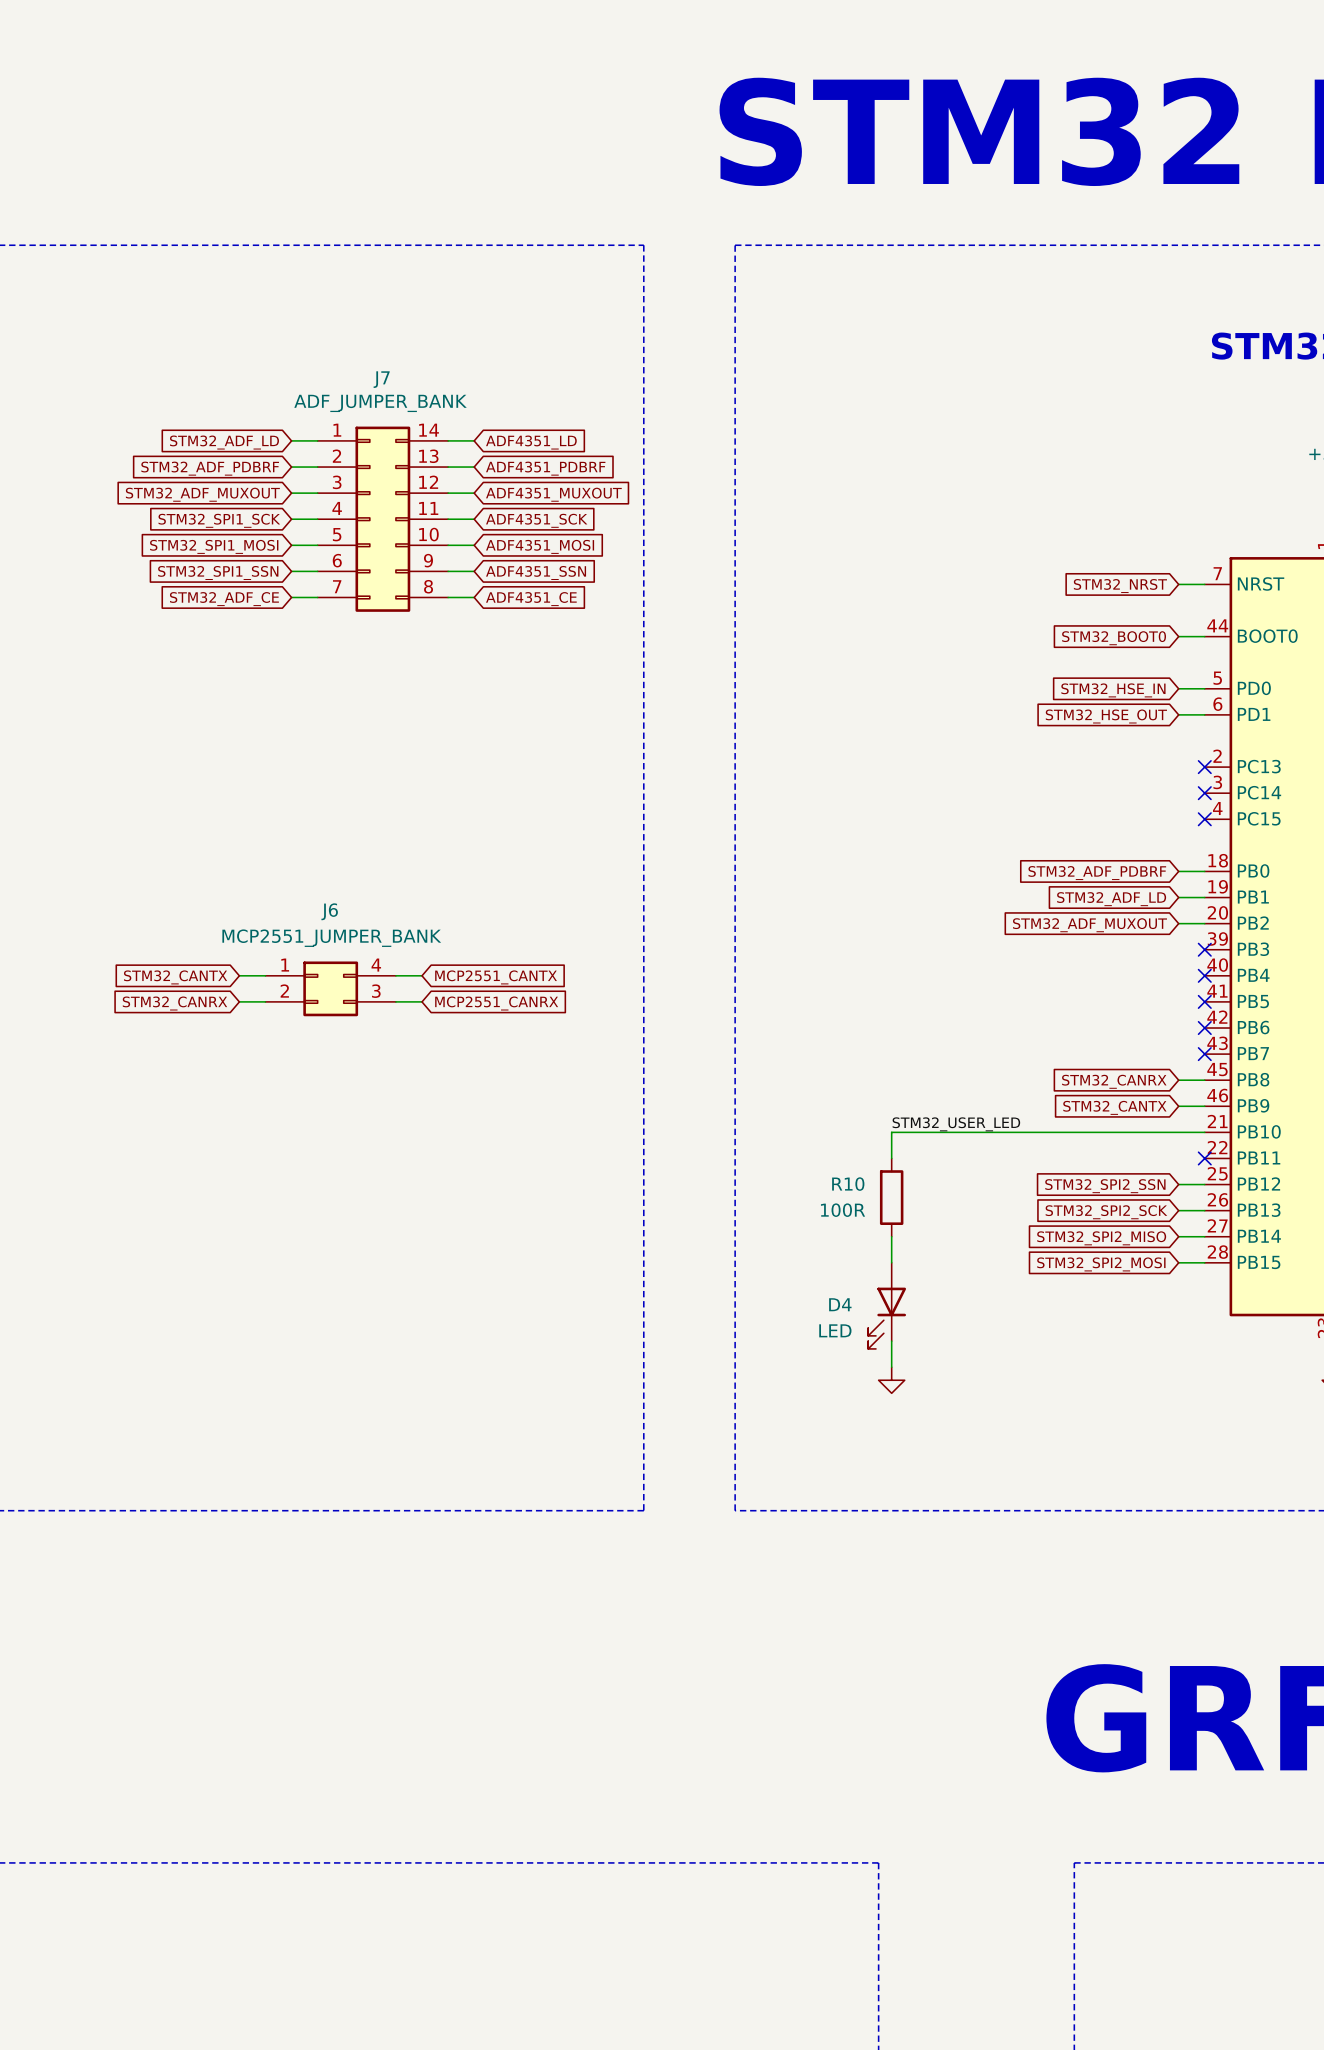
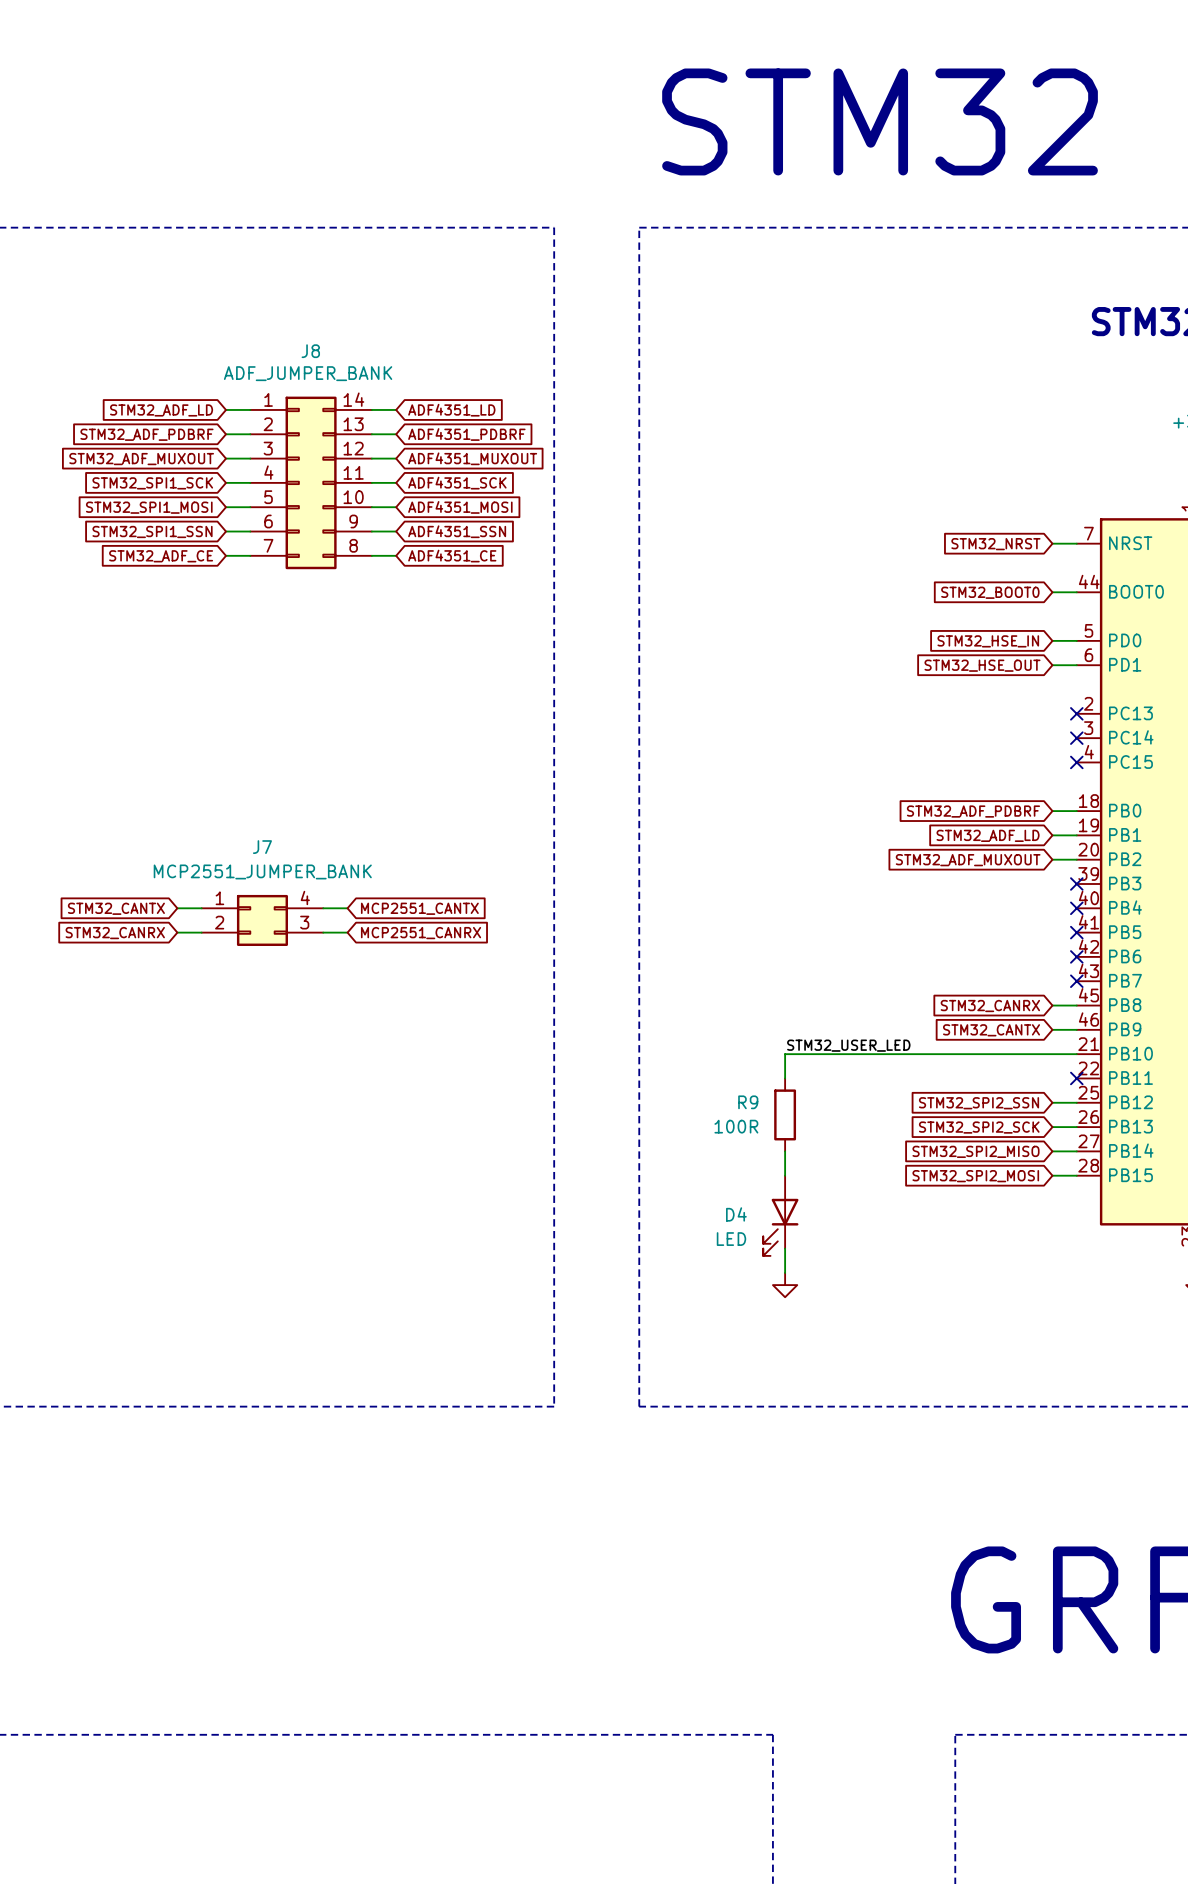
J7 name: J7 (381, 379) -> J8 (310, 351)
J6 name: J6 (329, 911) -> J7 (262, 847)
R10 name: R10 (848, 1184) -> R9 (748, 1102)

